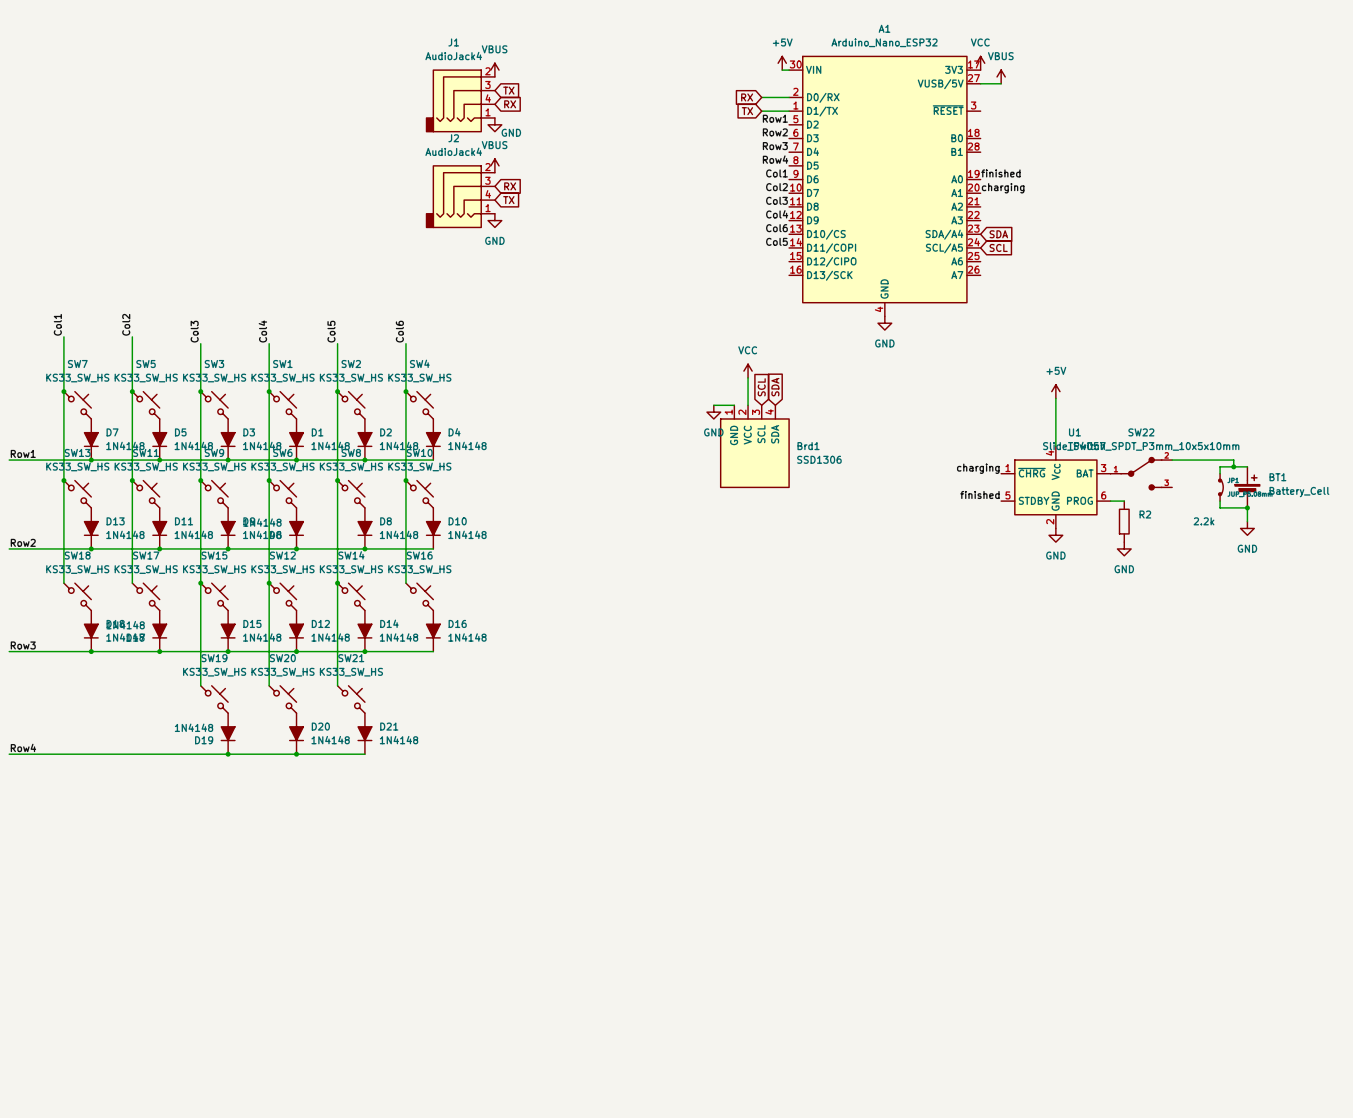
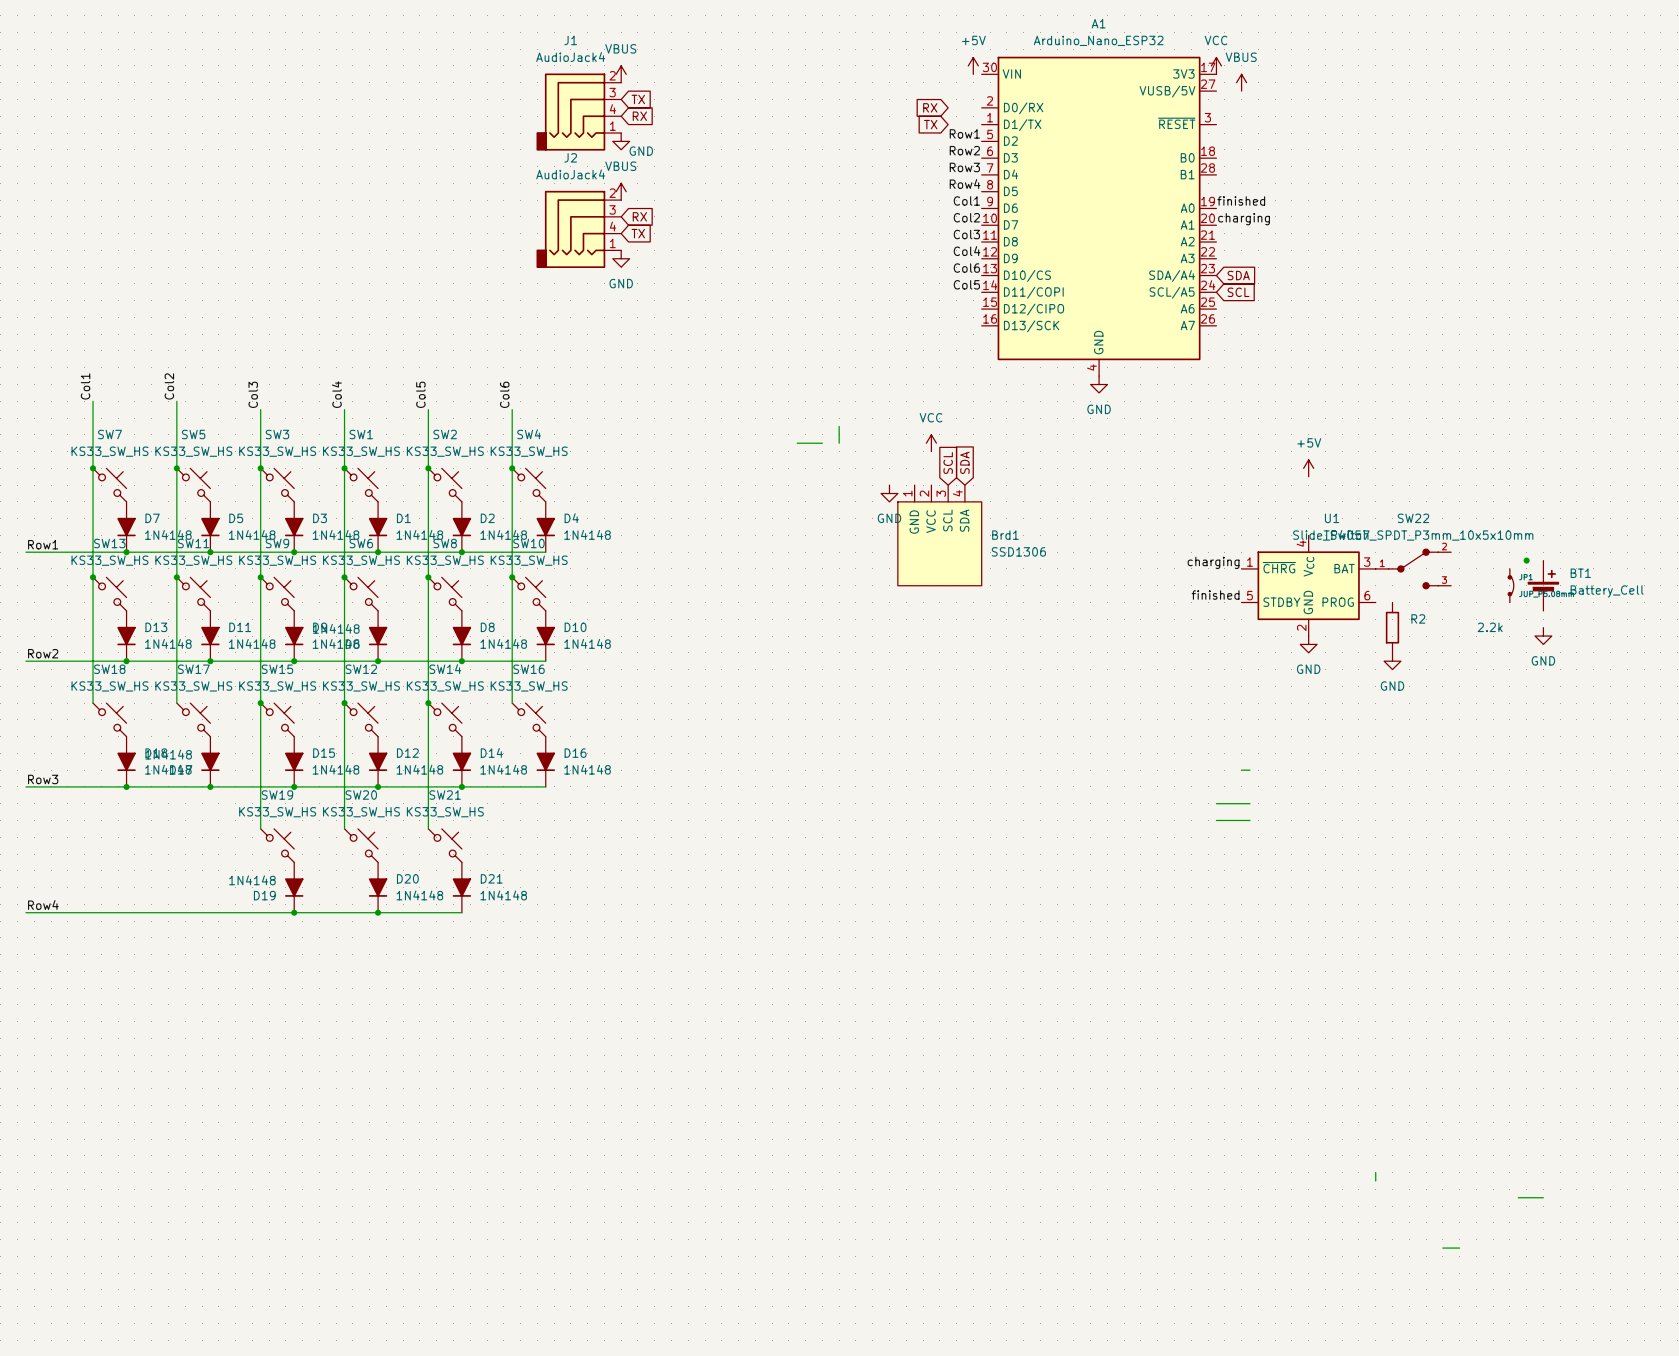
wire: (782, 70) (789, 70) -> none
wire: (980, 83) (1001, 83) -> none
wire: (761, 97) (789, 97) -> none
wire: (761, 111) (789, 111) -> none
wire: none -> (839, 426) (839, 443)
wire: (748, 377) (748, 405) -> none
wire: (1055, 398) (1055, 446) -> none
wire: (713, 405) (734, 405) -> (797, 443) (822, 443)
wire: (1172, 460) (1233, 460) (1233, 466) -> none
wire: (1247, 466) (1220, 466) (1220, 473) -> none
wire: (1110, 501) (1124, 501) -> none
wire: (1220, 501) (1220, 507) (1247, 507) (1247, 521) -> none
junction: (1247, 507) -> none
wire: none -> (1241, 770) (1249, 770)
wire: none -> (1216, 803) (1249, 803)
wire: none -> (1216, 820) (1249, 820)
wire: none -> (1375, 1172) (1375, 1180)
wire: none -> (1518, 1197) (1543, 1197)
wire: none -> (1442, 1248) (1459, 1248)

